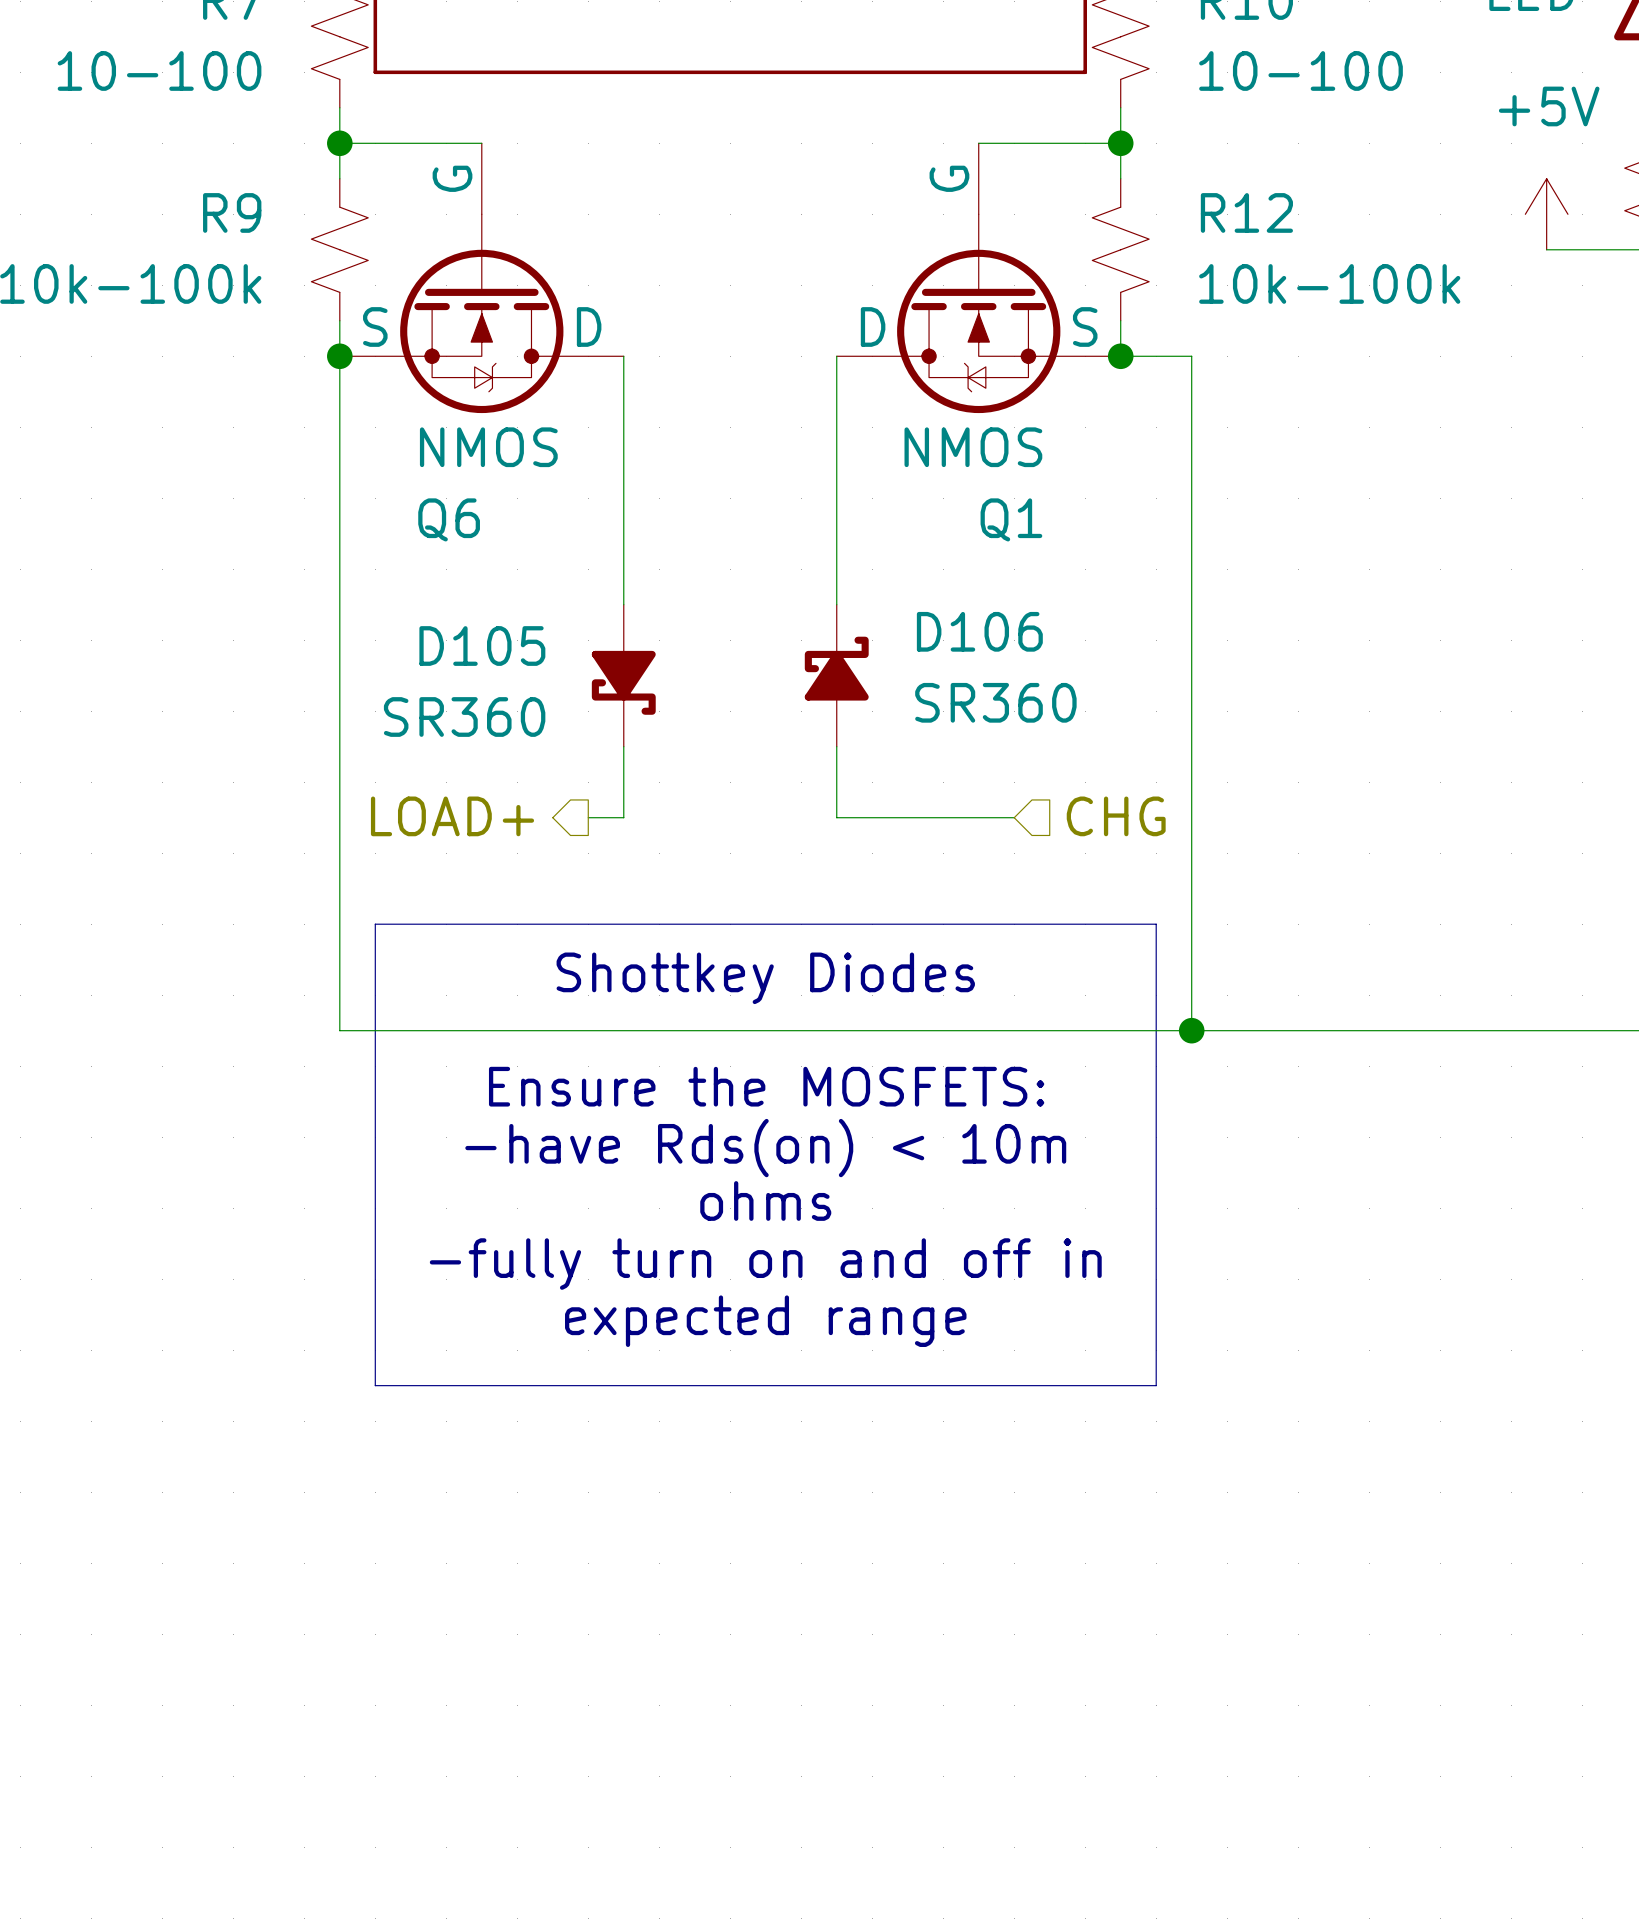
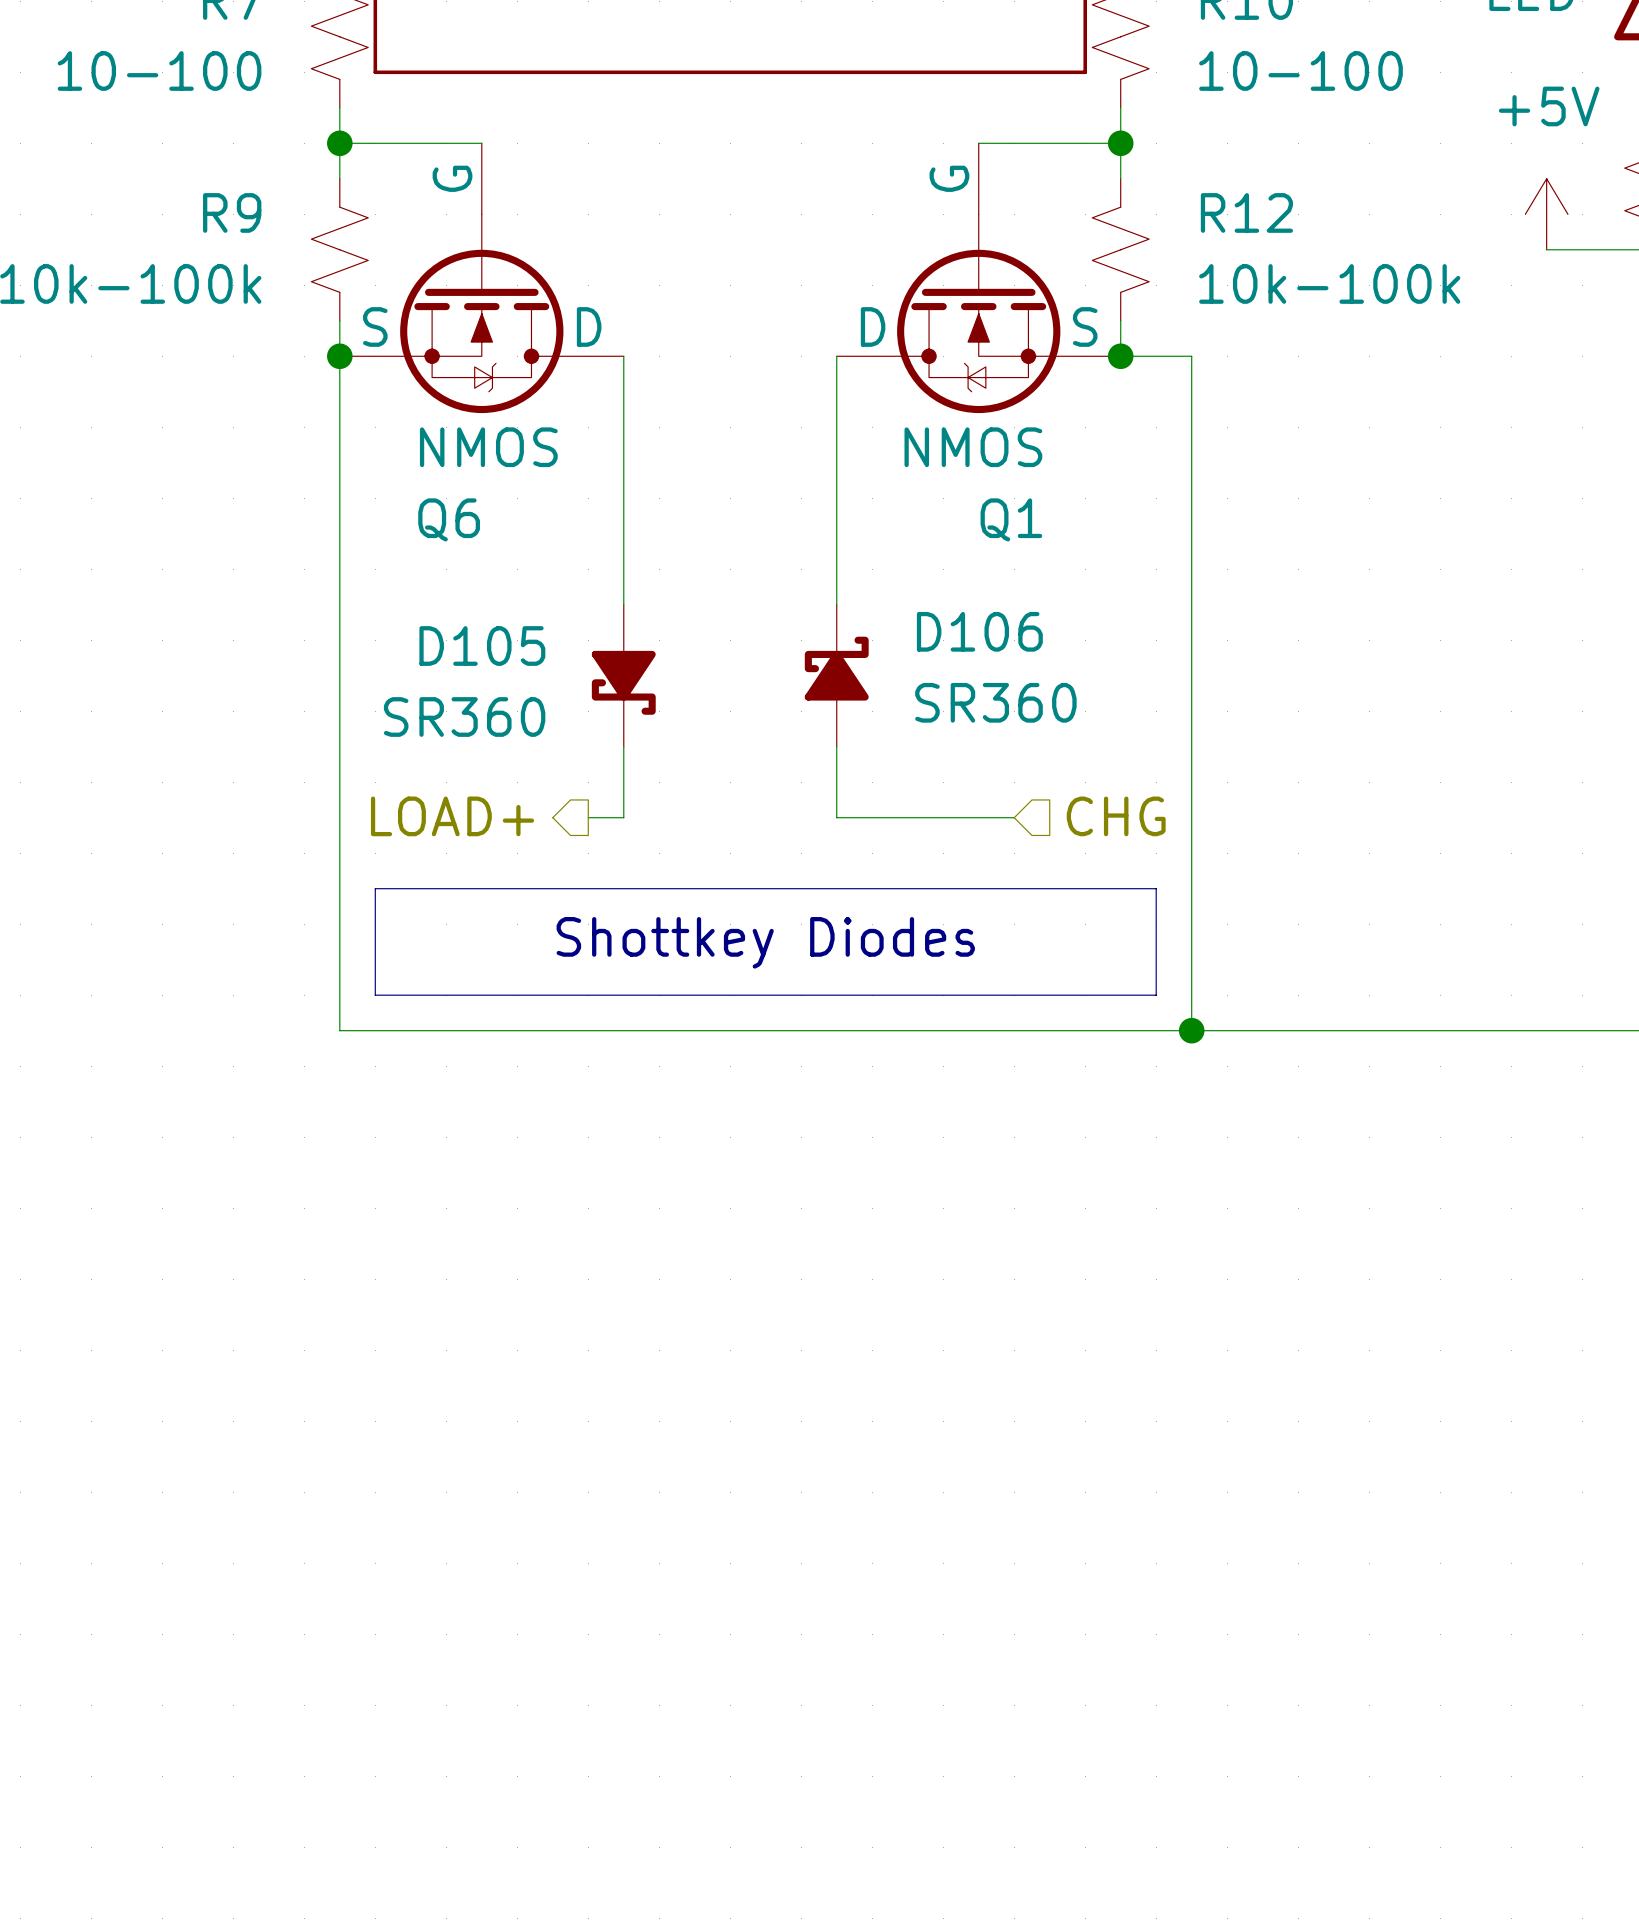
line: (375, 924) (1156, 924) -> (375, 924) (375, 888) (1156, 888) (1156, 924)
text position: Shottkey Diodes (765, 978) -> Shottkey Diodes (765, 942)
line: (375, 995) (375, 1385) (1156, 1385) (1156, 995) -> (375, 995) (1156, 995)
text: Ensure the MOSFETS: (766, 1086) -> none
text: -have Rds(on) < 10m (765, 1148) -> none
text: ohms (765, 1200) -> none
text: -fully turn on and off in (765, 1264) -> none
text: expected range (765, 1321) -> none

